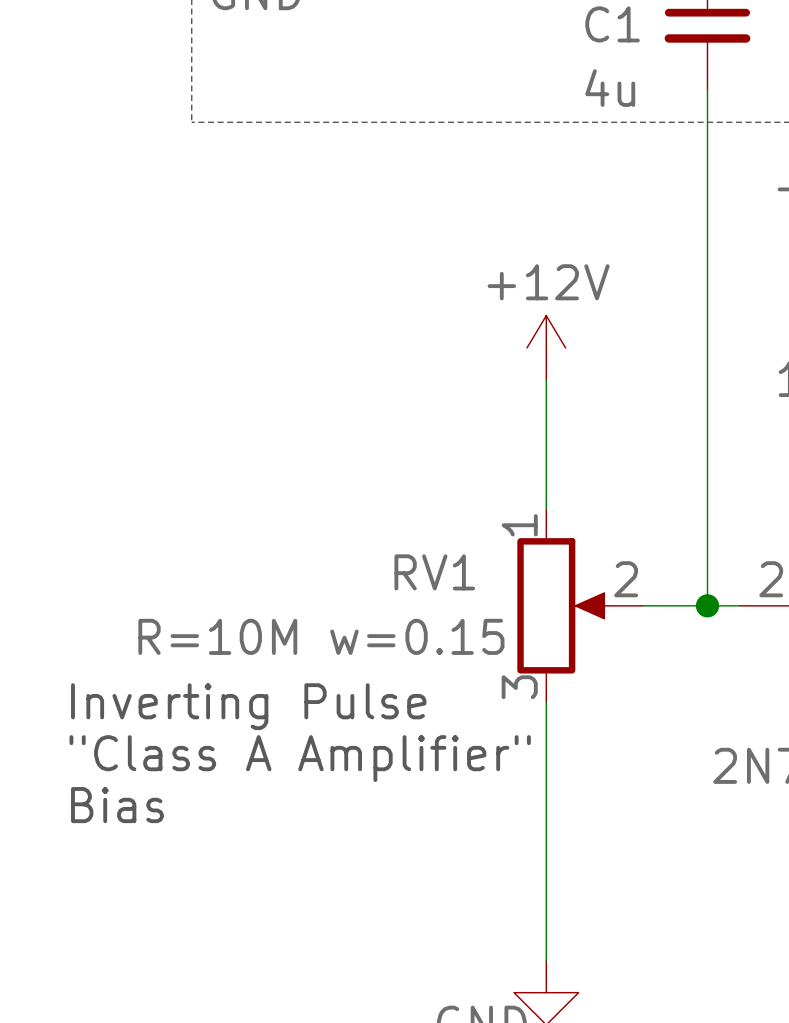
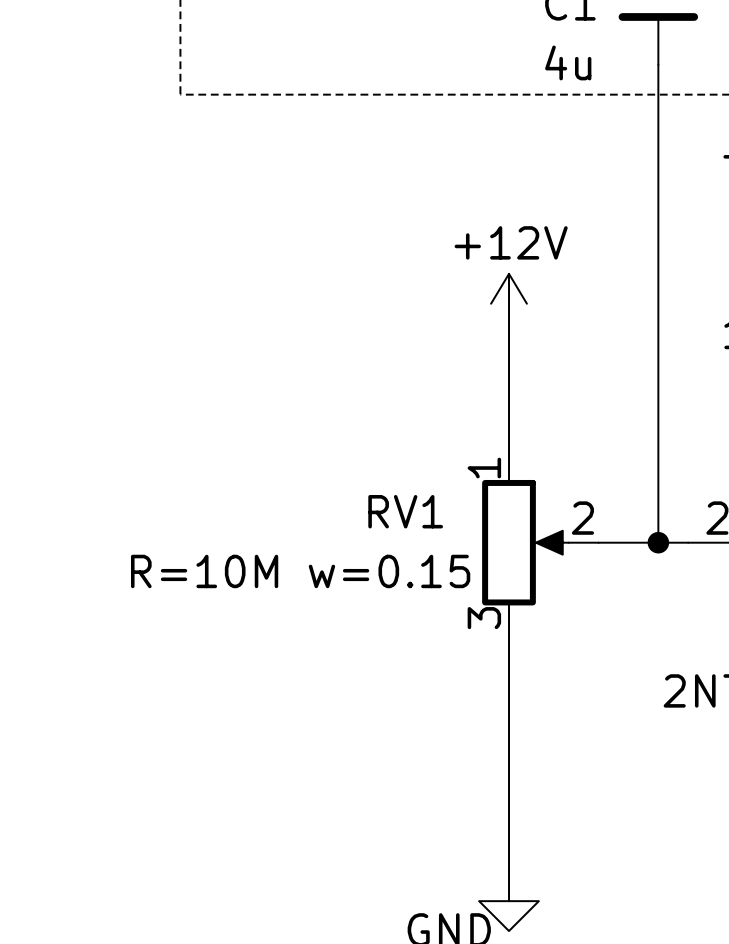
text: Inverting Pulse (248, 706) -> none
text: "Class A Amplifier" (300, 758) -> none
text: Bias (117, 805) -> none

